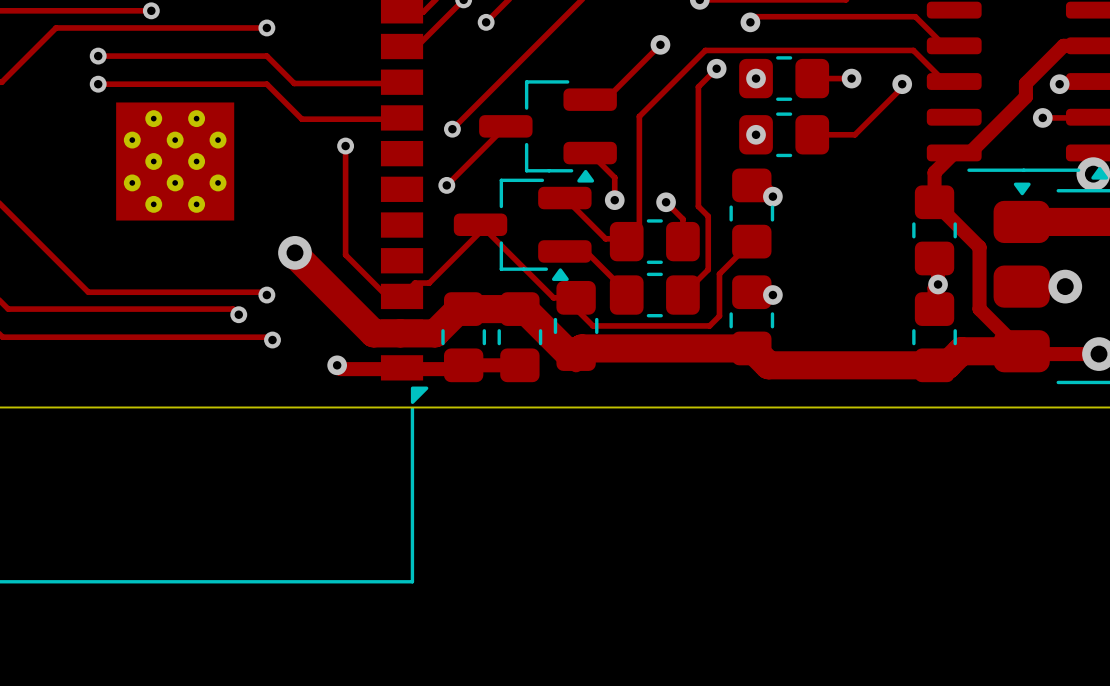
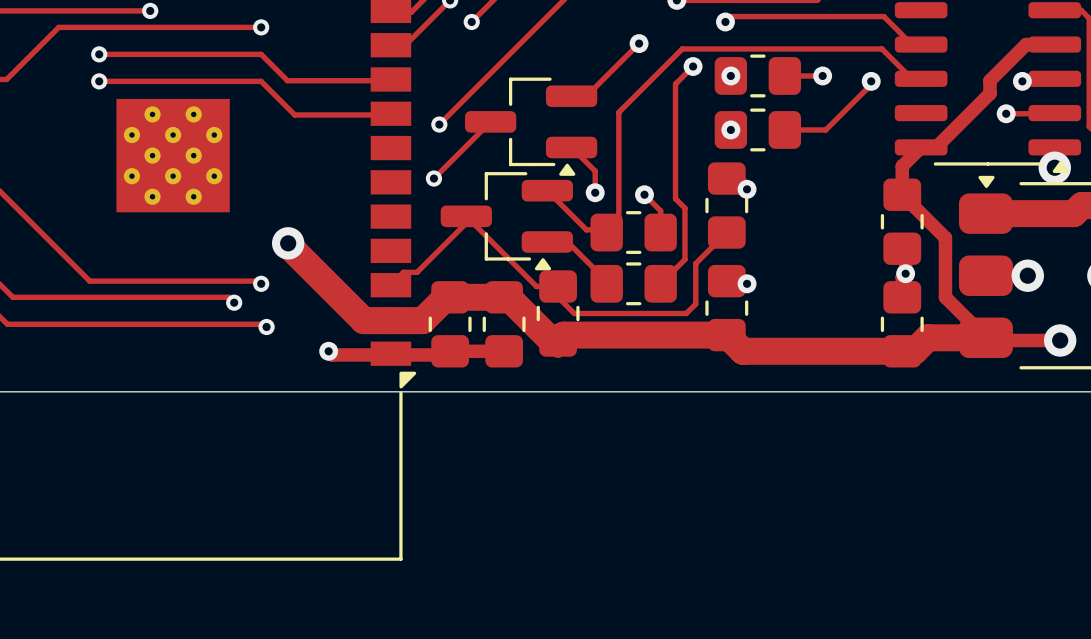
track: (345, 146) (345, 254) (387, 296) (402, 296) -> none
via: (345, 146) -> none

